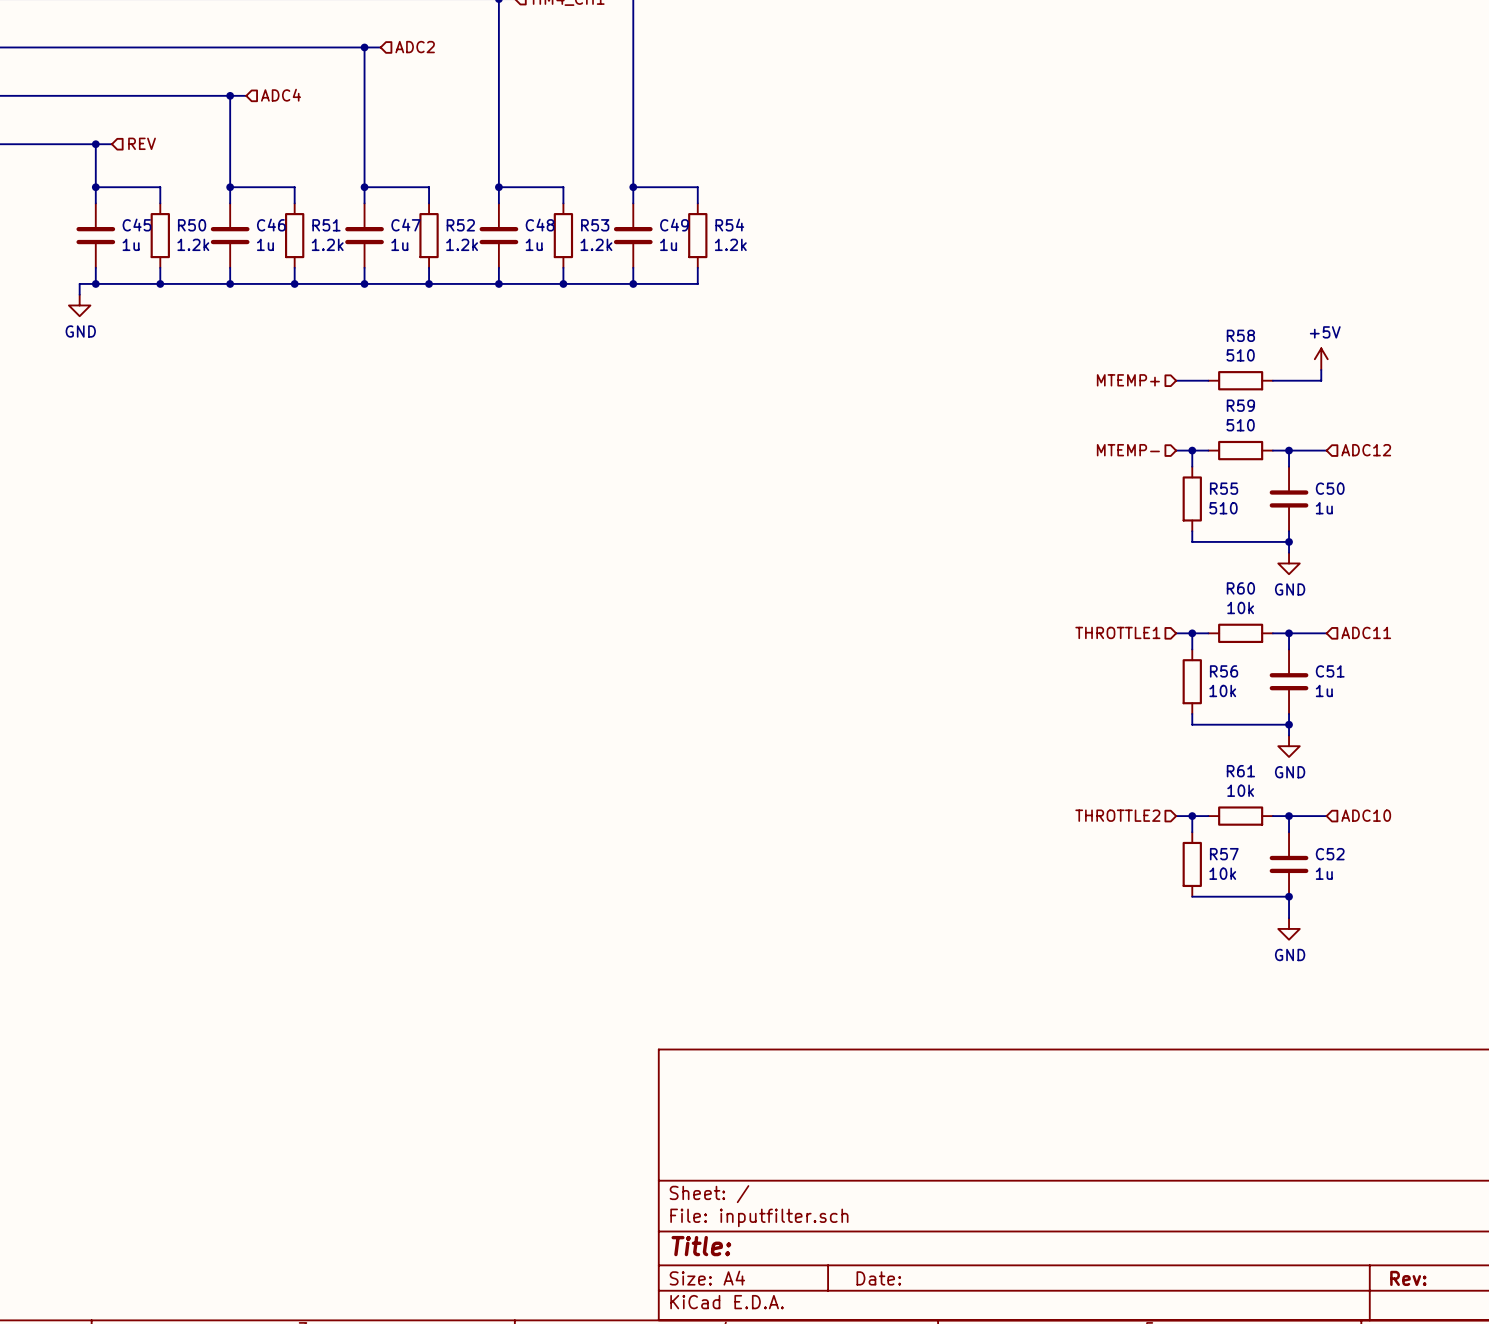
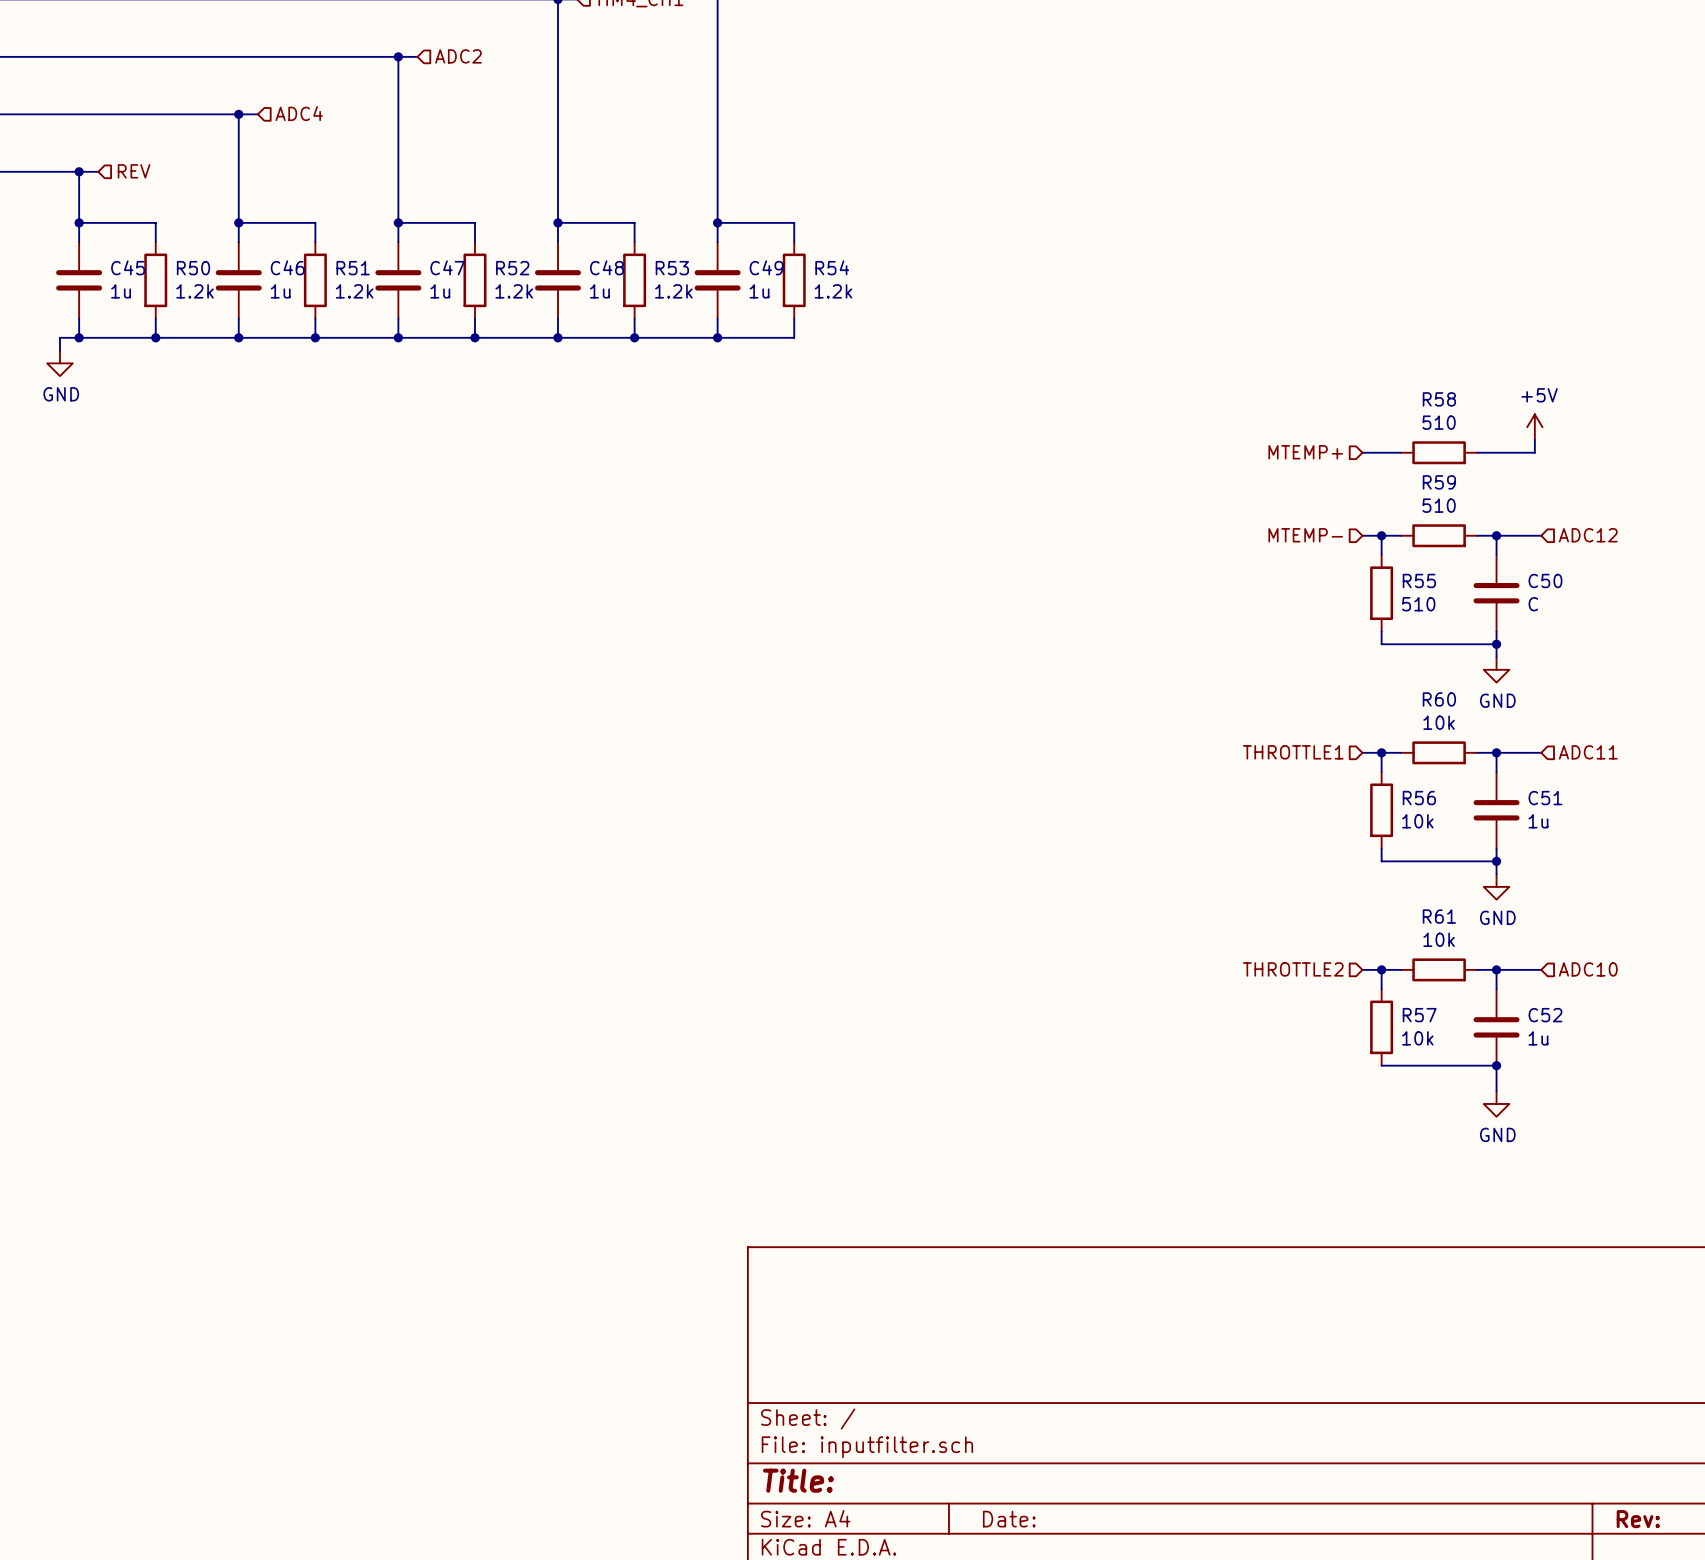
C50 value: 1u (1324, 508) -> C (1533, 604)

